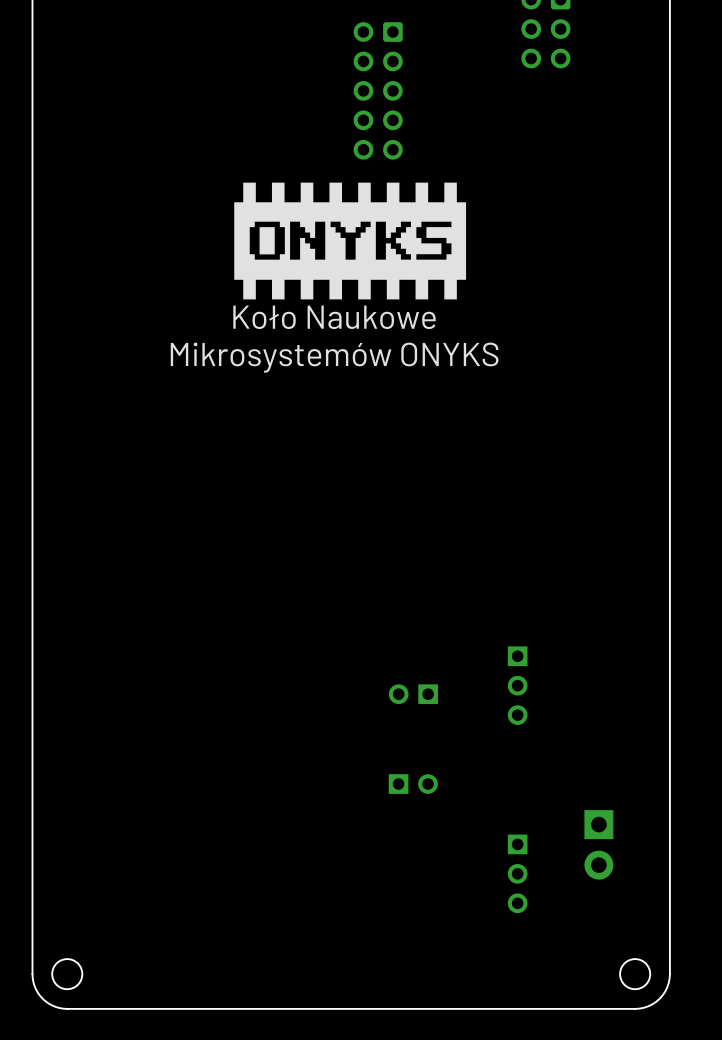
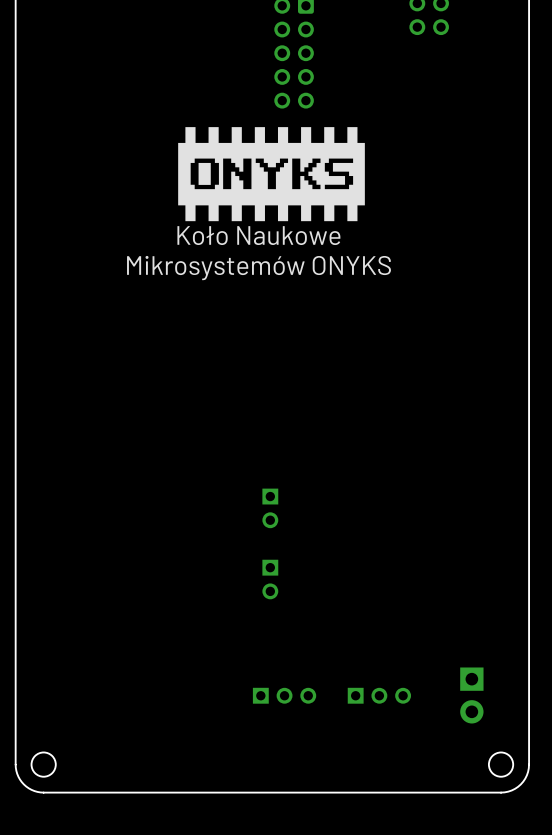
part: none -> (270, 508)
part: (517, 685) -> none
part: (413, 694) -> none
part: none -> (270, 579)
part: (413, 784) -> none
part position: (598, 844) -> (471, 695)
part rotation: 0° (517, 873) -> 90° counterclockwise (379, 695)
part: none -> (284, 695)

